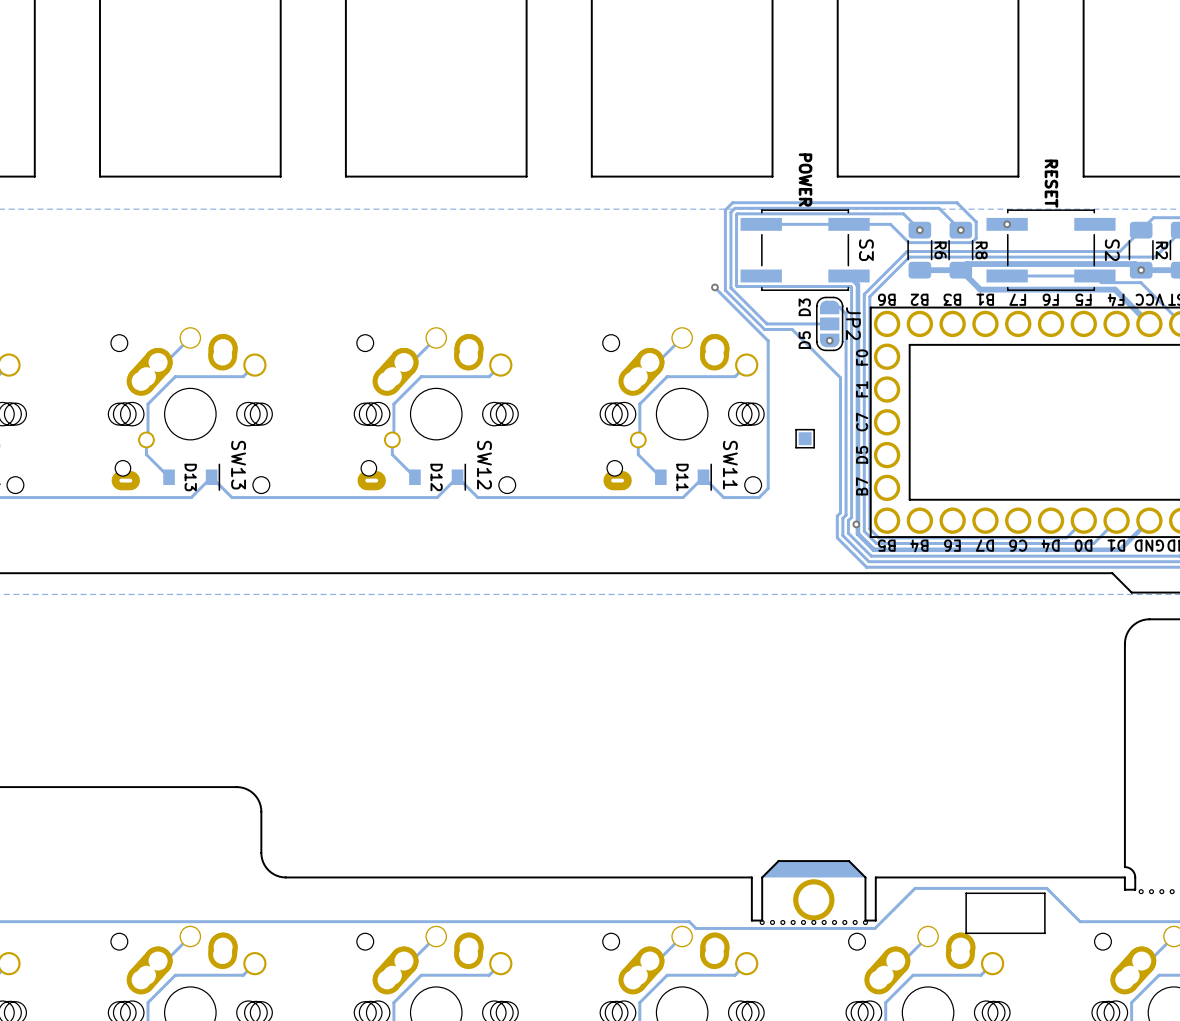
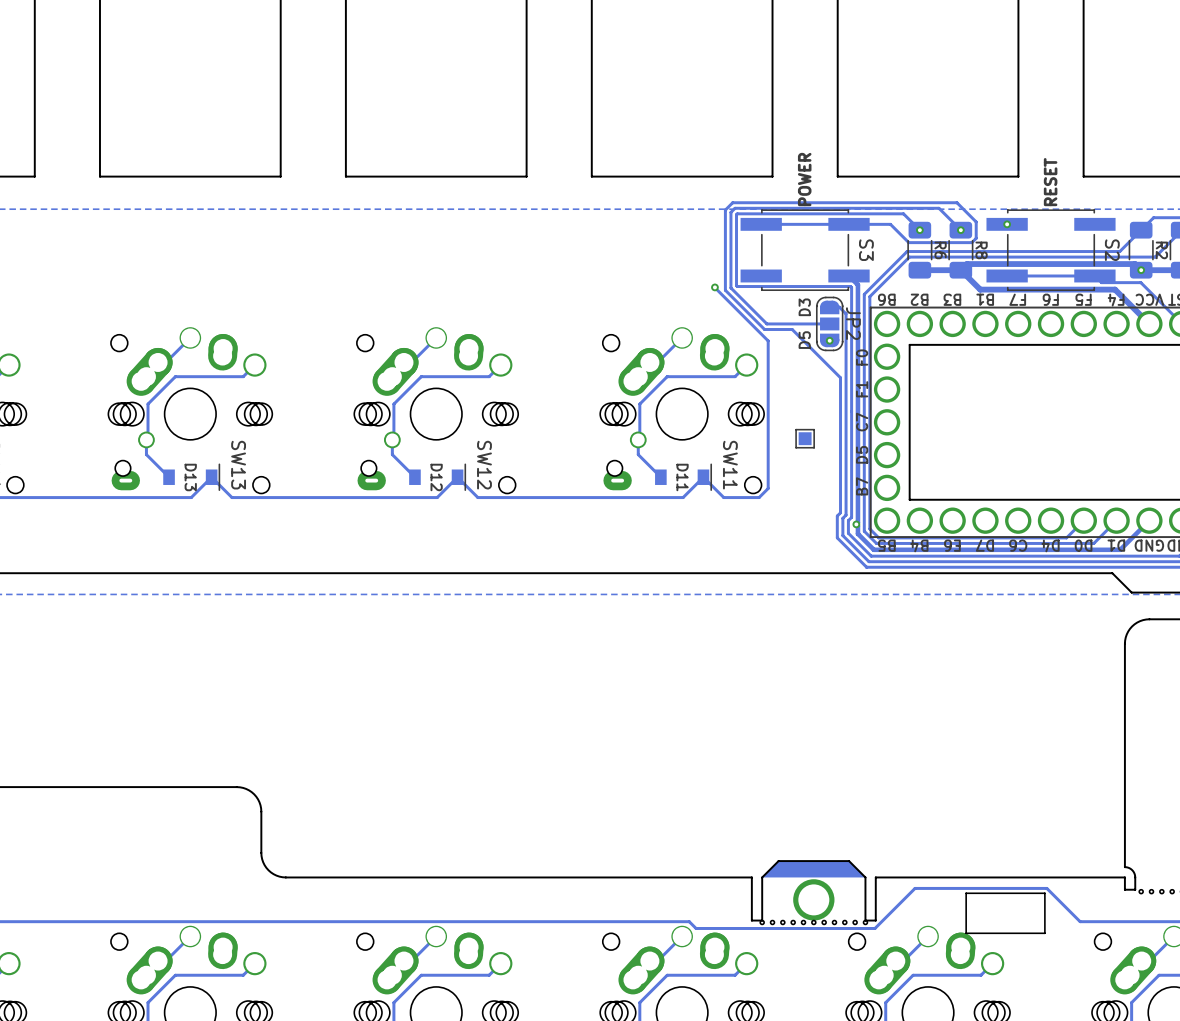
text rotation: 0° (805, 180) -> 180° (804, 179)
text rotation: 0° (1051, 183) -> 180° (1050, 182)

